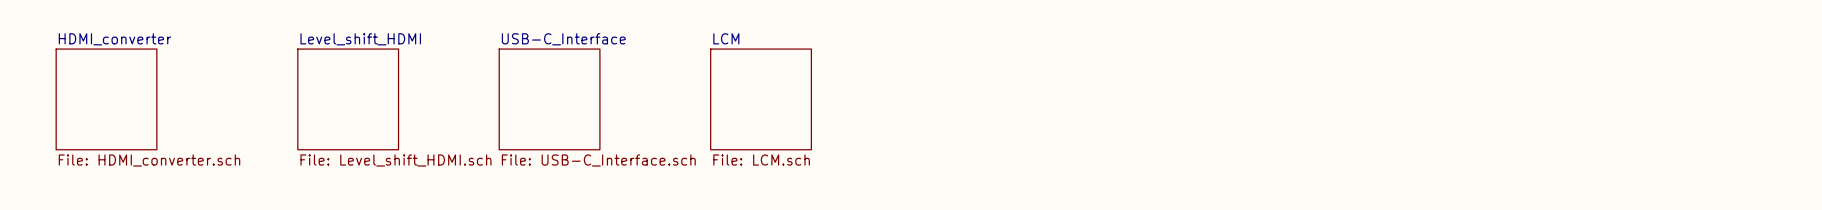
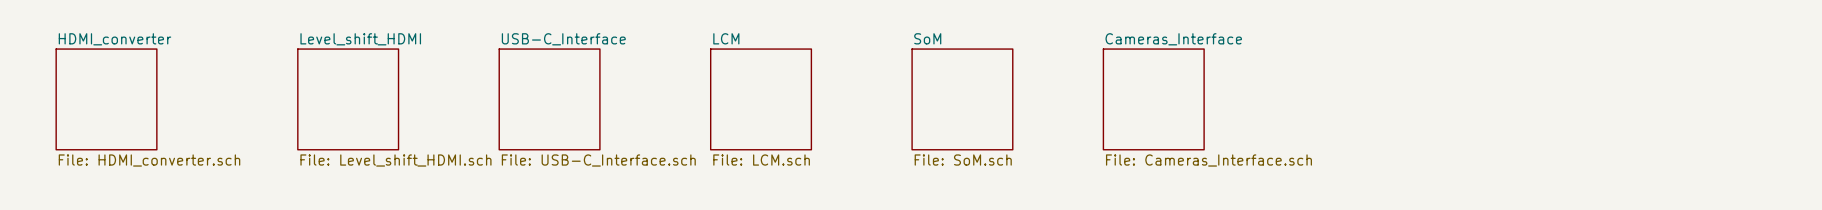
sheet SoM: none -> File: SoM.sch (962, 99)
sheet Cameras_Interface: none -> File: Cameras_Interface.sch (1153, 99)

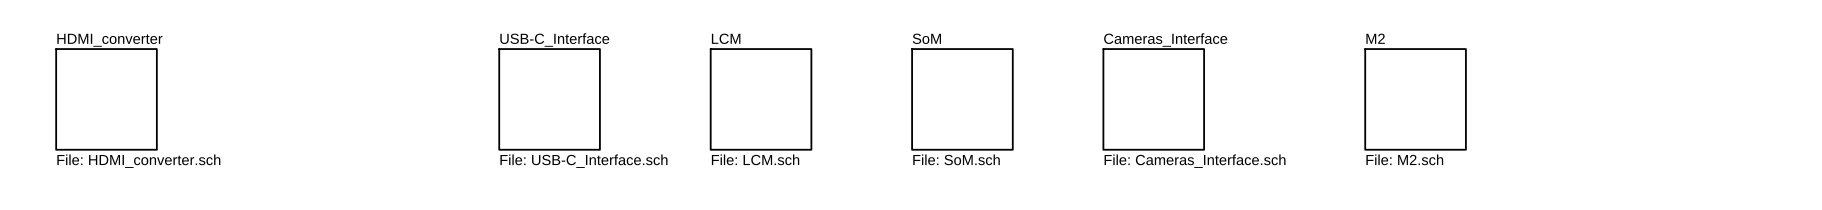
sheet Level_shift_HDMI: File: Level_shift_HDMI.sch (348, 99) -> none
sheet M2: none -> File: M2.sch (1415, 99)

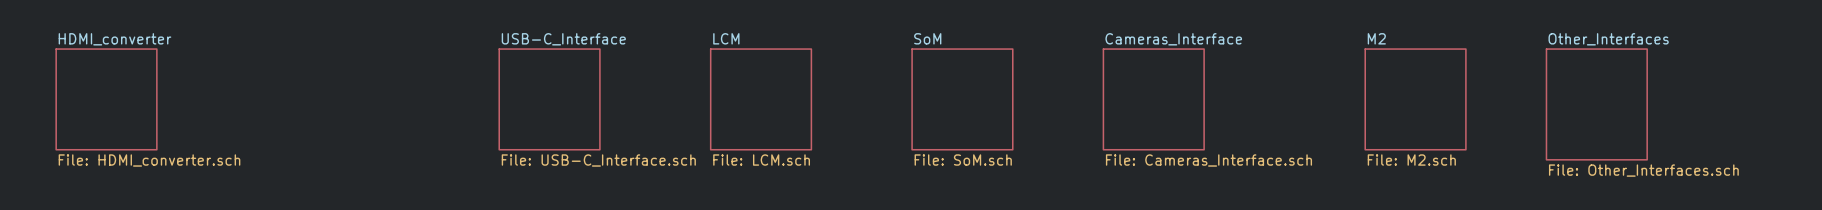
sheet Other_Interfaces: none -> File: Other_Interfaces.sch (1596, 104)

